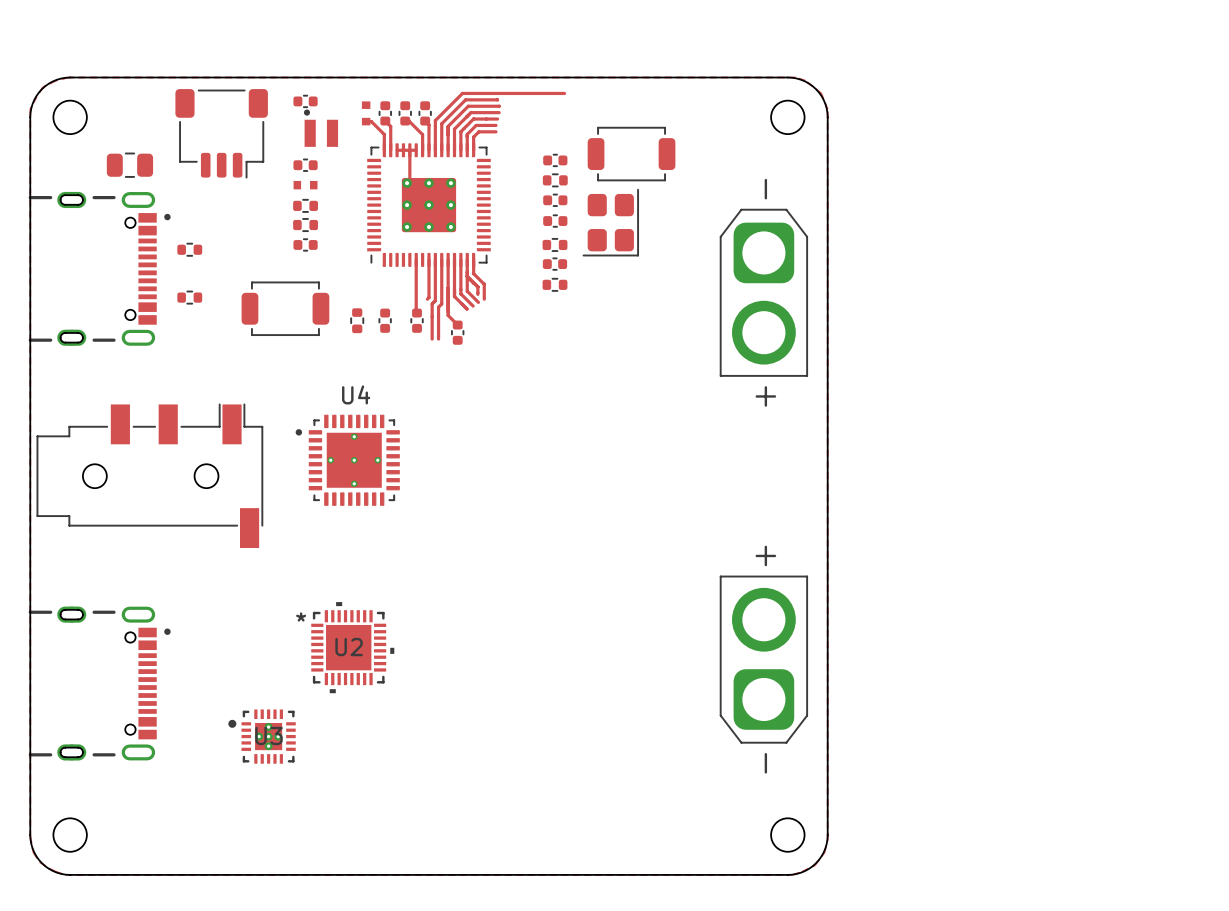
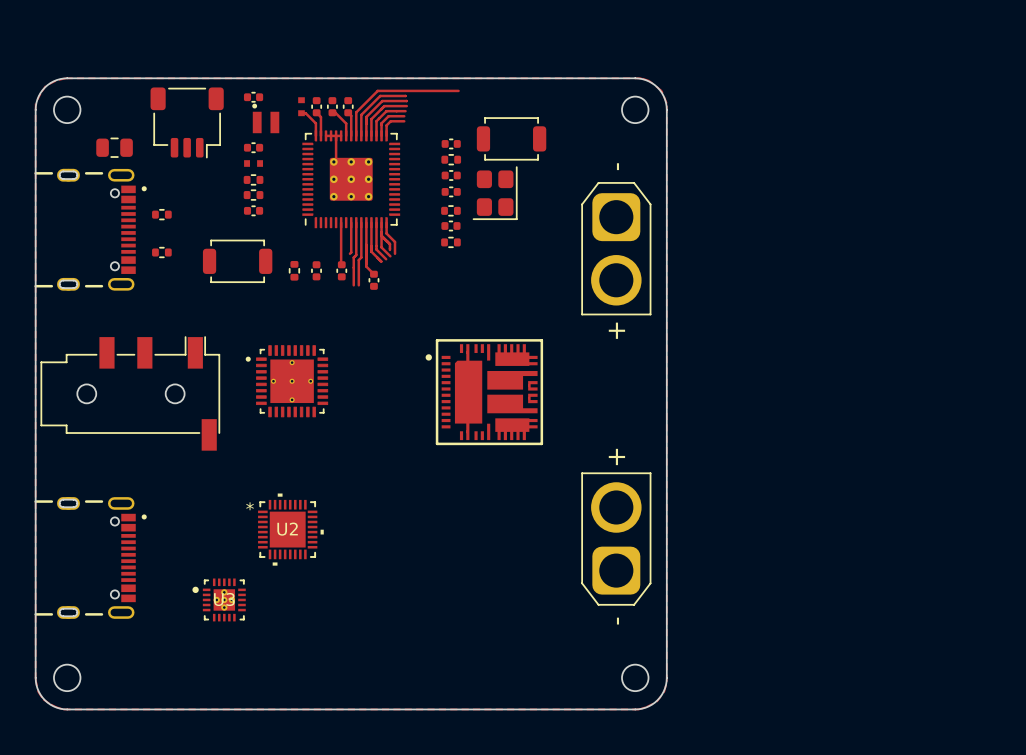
U4 name: U4 (356, 394) -> none
part: none -> (484, 392)

